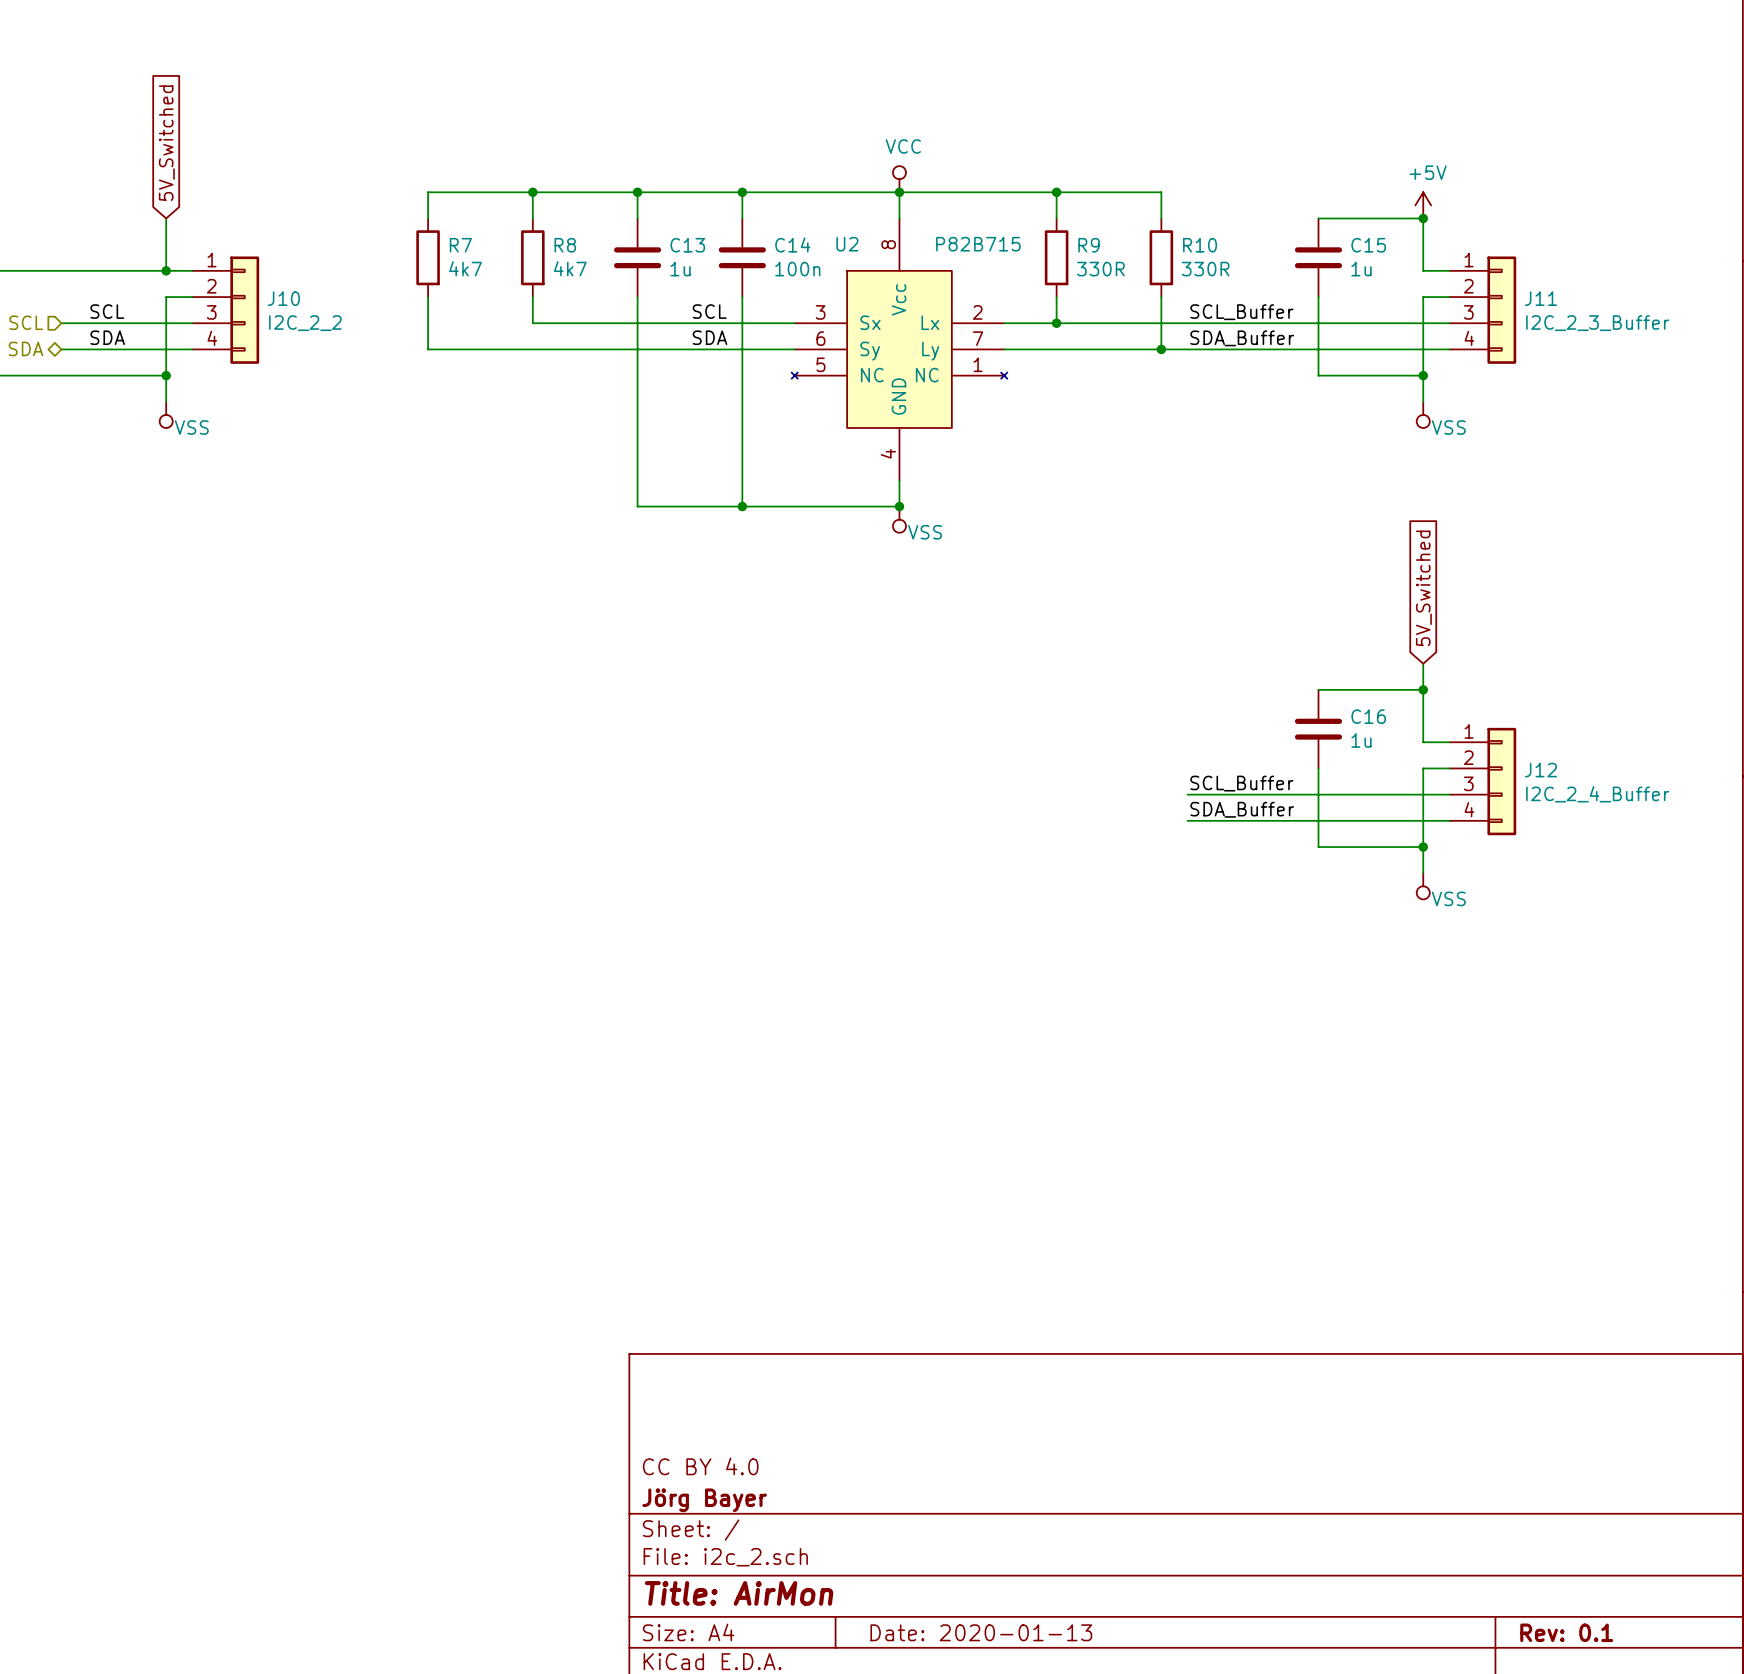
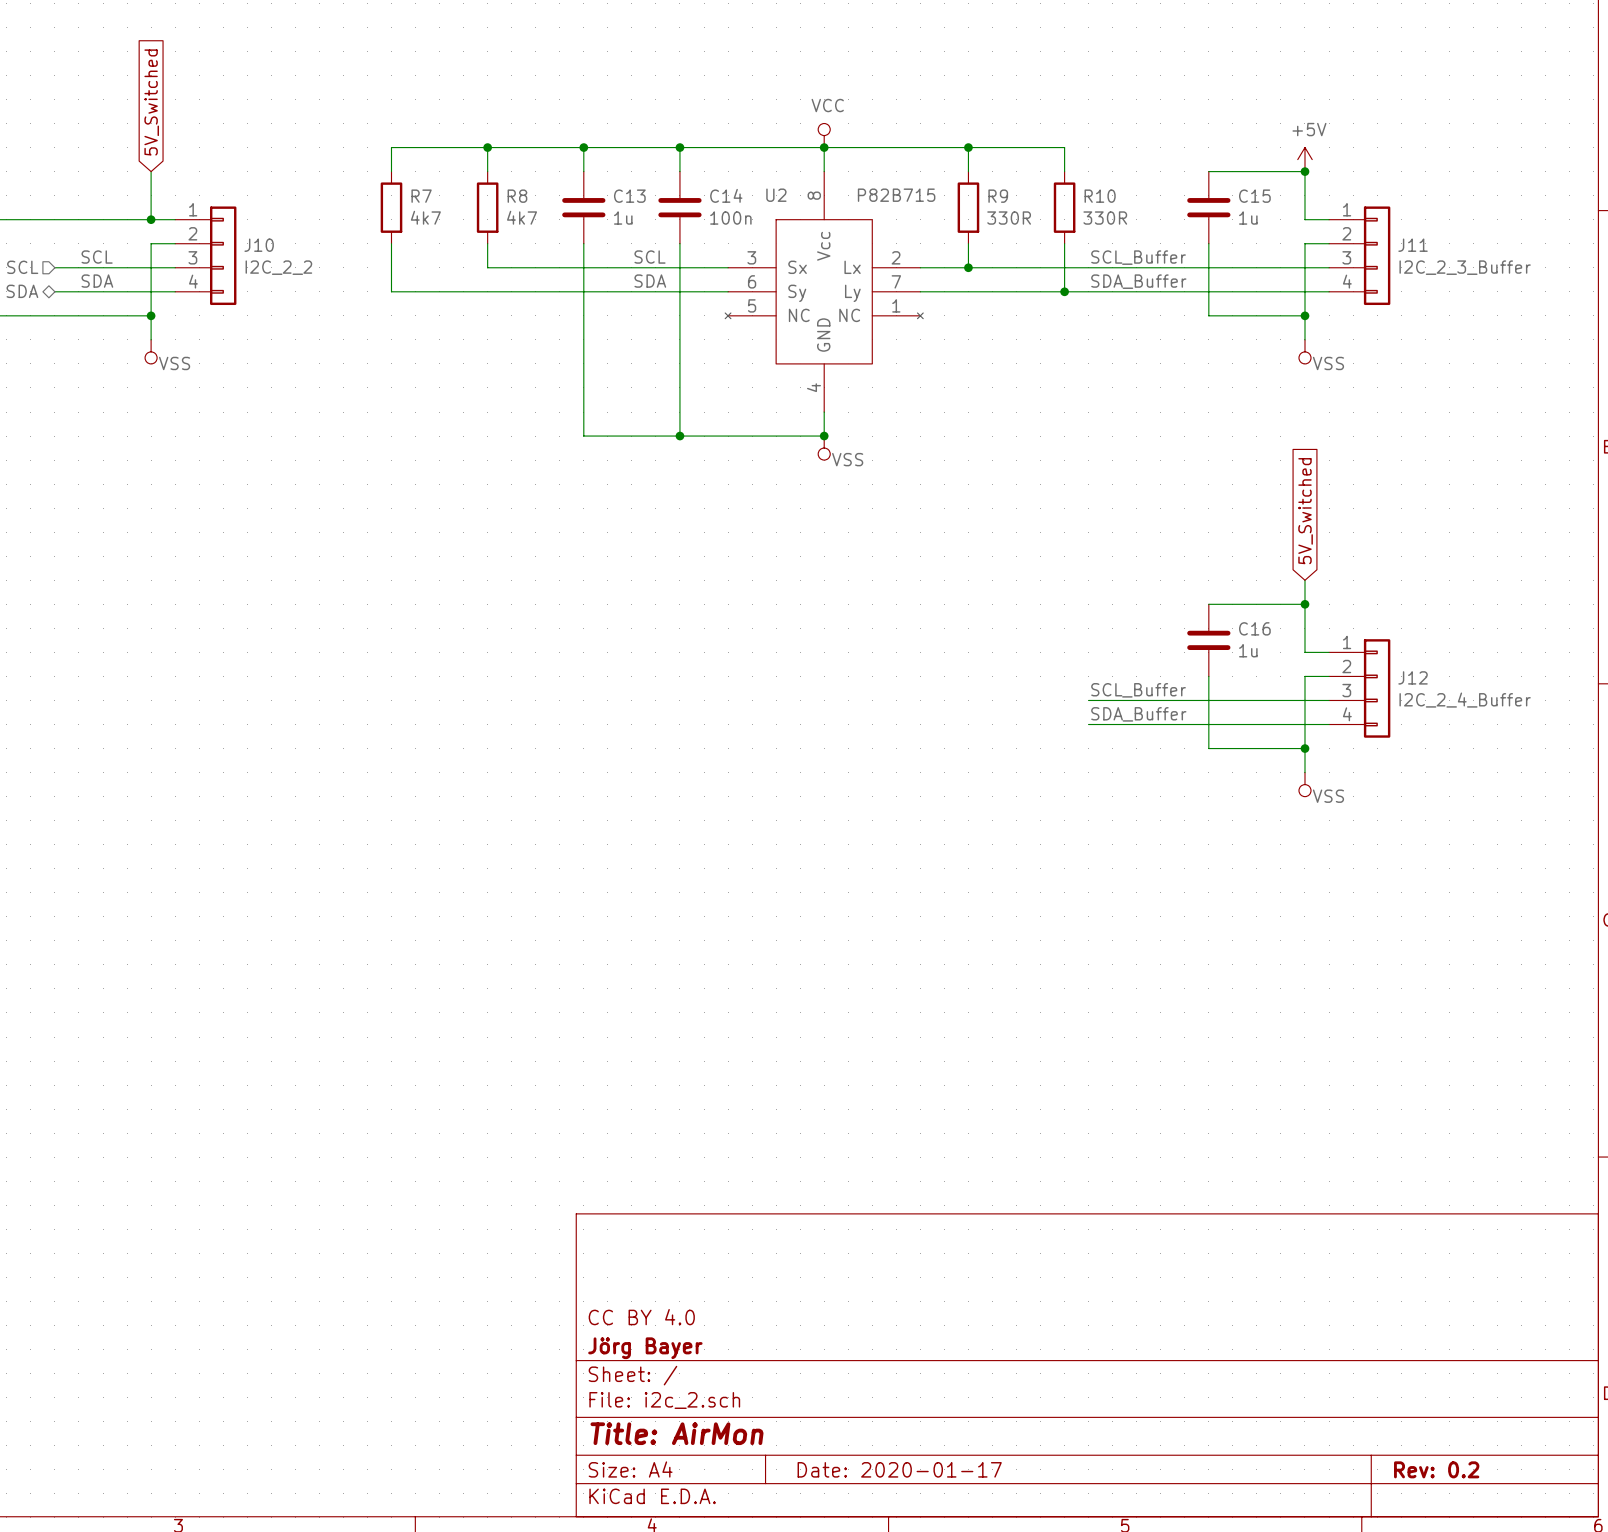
title block: Date: 2020-01-13 (981, 1632) -> Date: 2020-01-17 (899, 1469)
title block: Rev: 0.1 (1566, 1632) -> Rev: 0.2 (1436, 1469)

